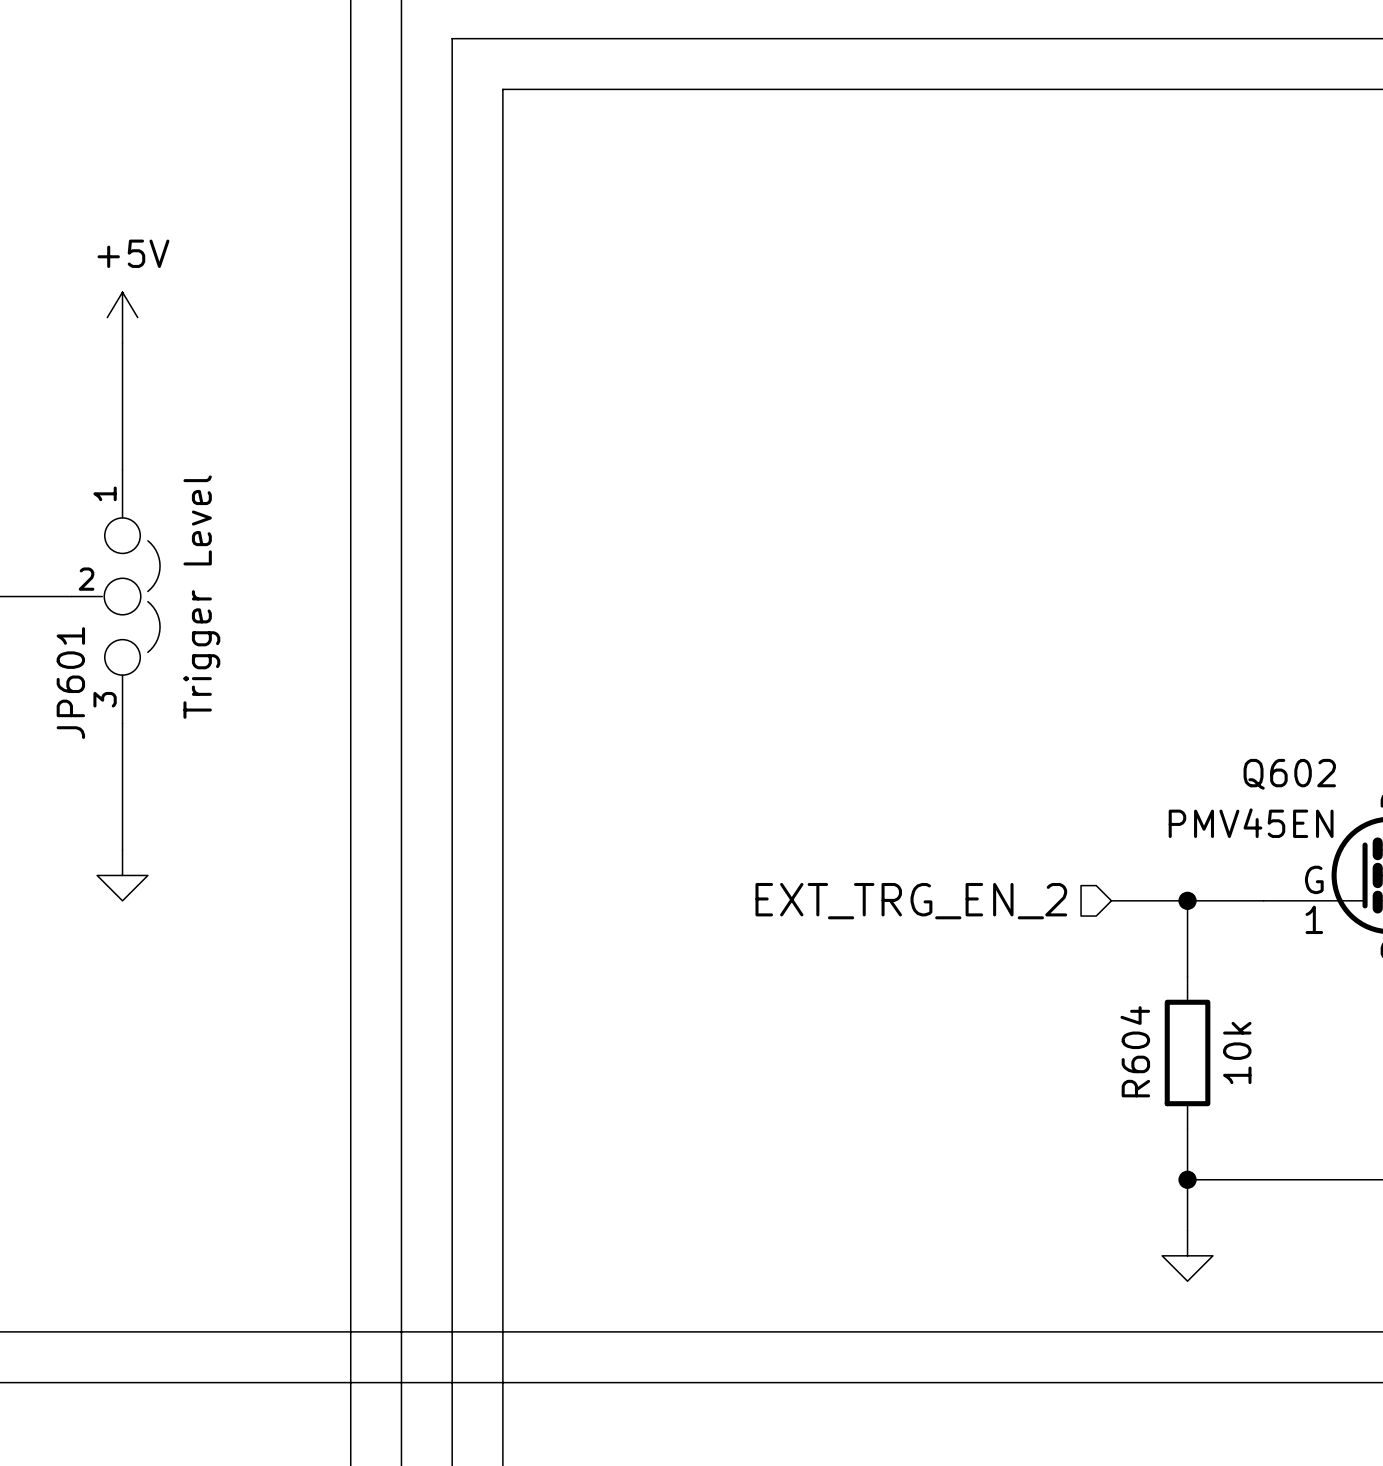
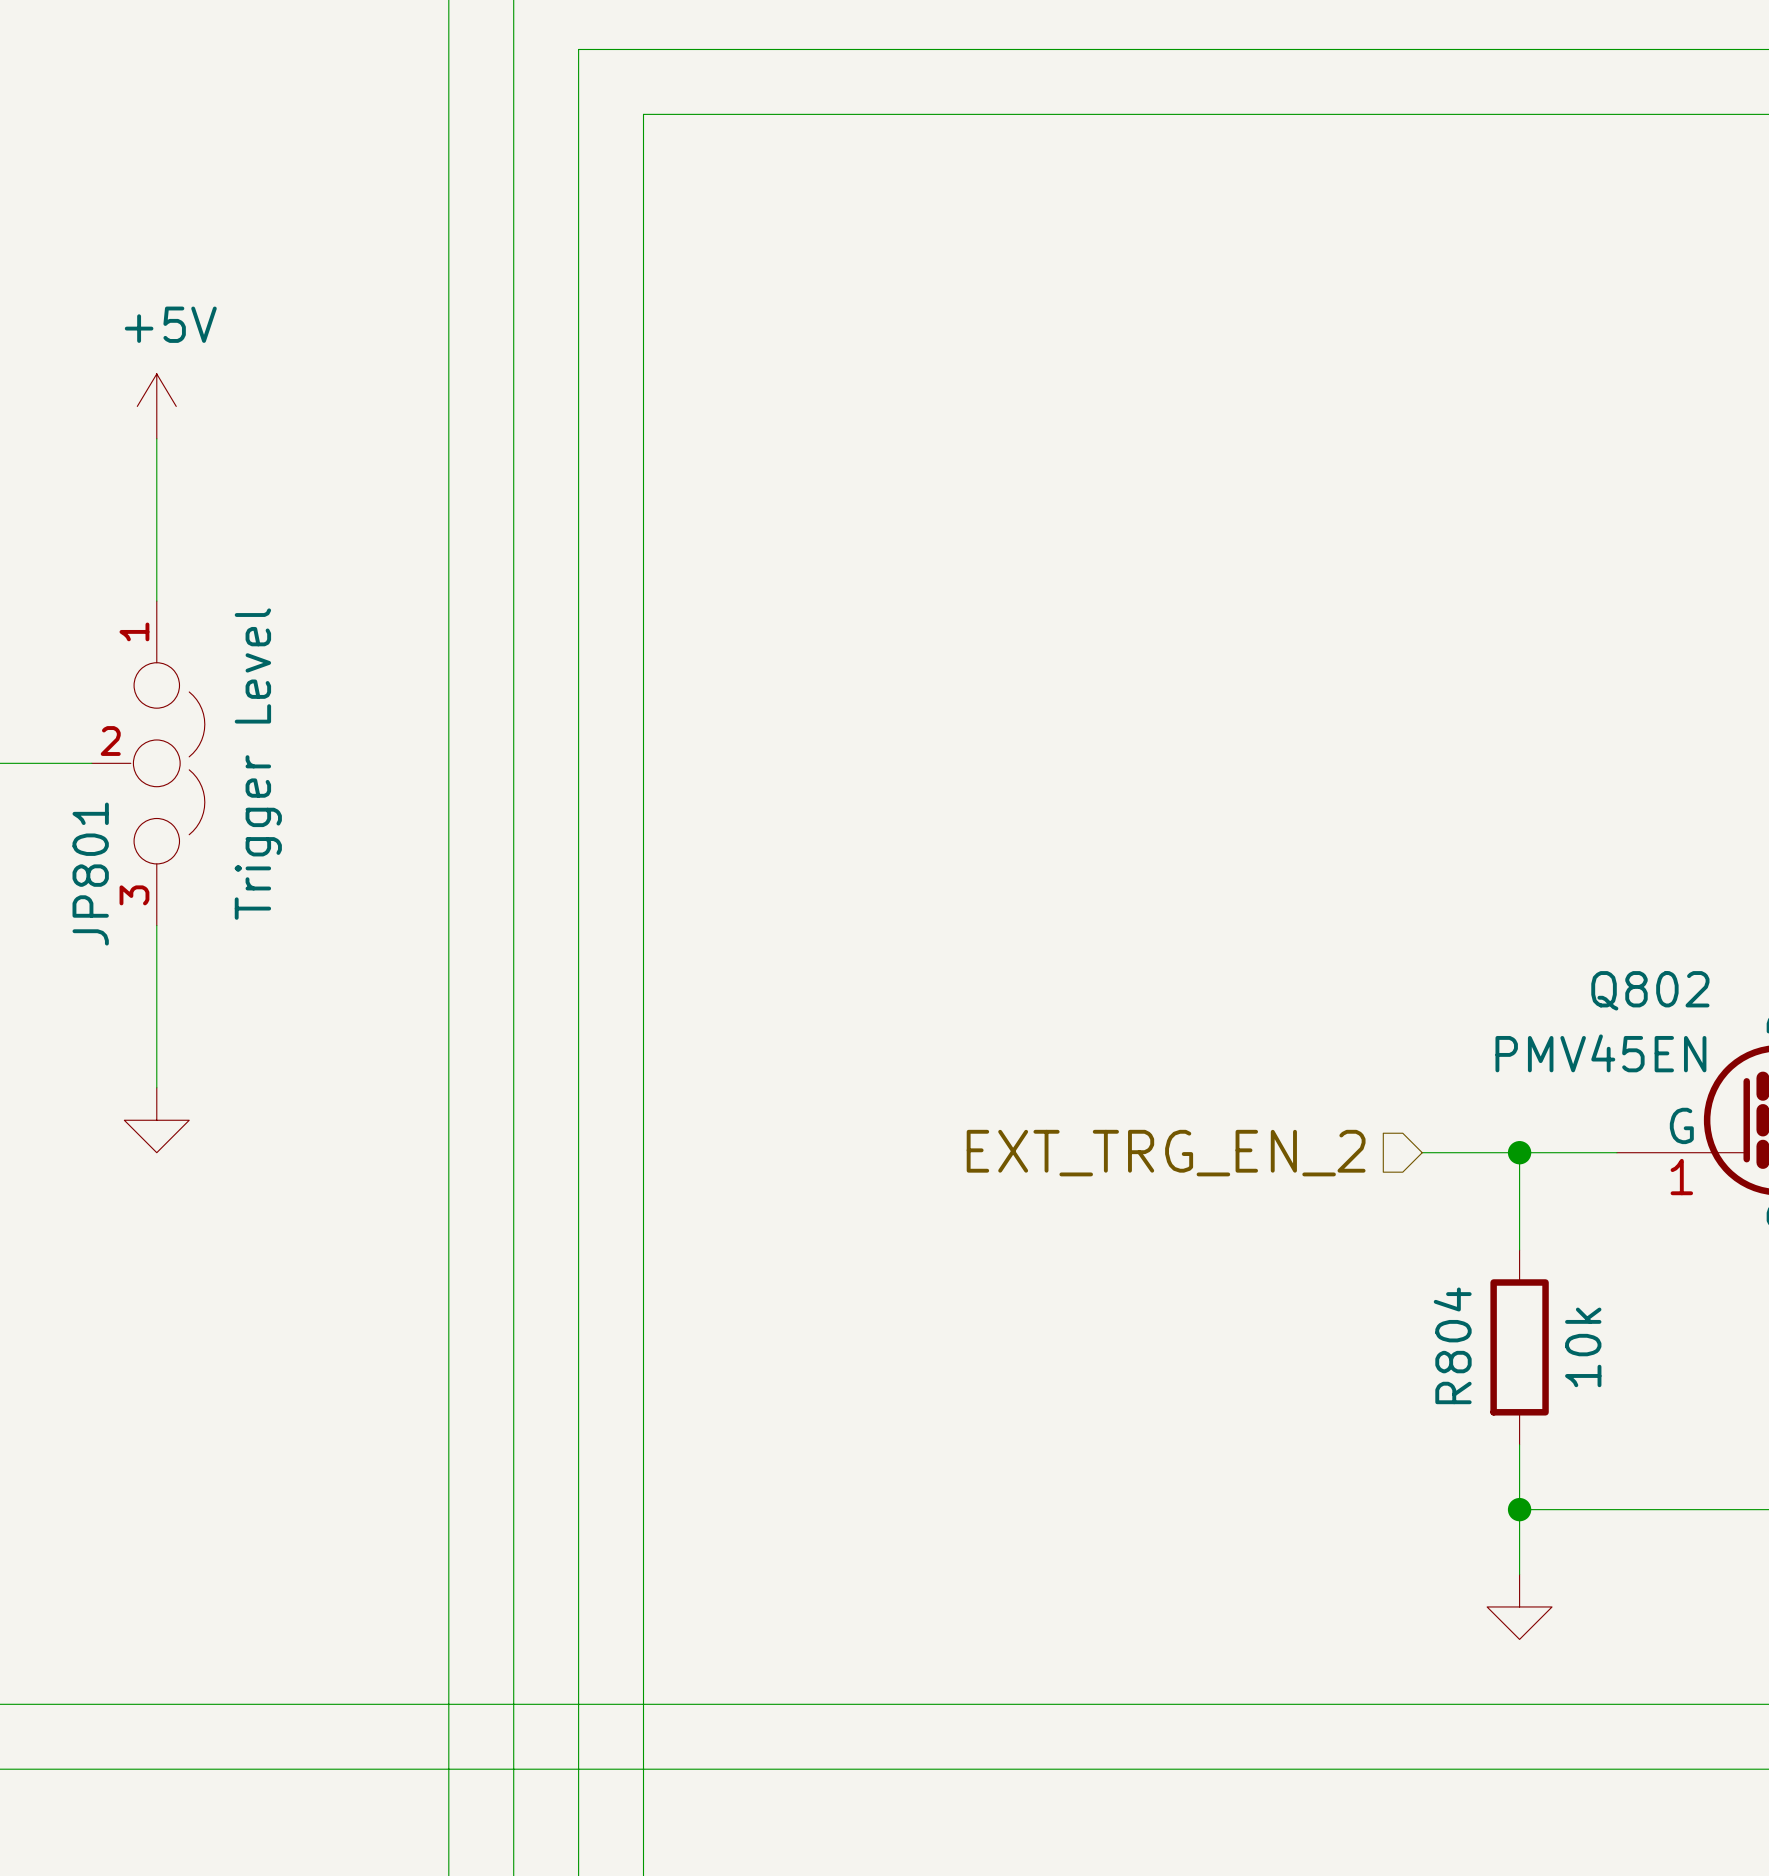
JP601 name: JP601 (70, 683) -> JP801 (90, 874)
Q602 name: Q602 (1289, 774) -> Q802 (1650, 990)
R604 name: R604 (1135, 1051) -> R804 (1452, 1345)

